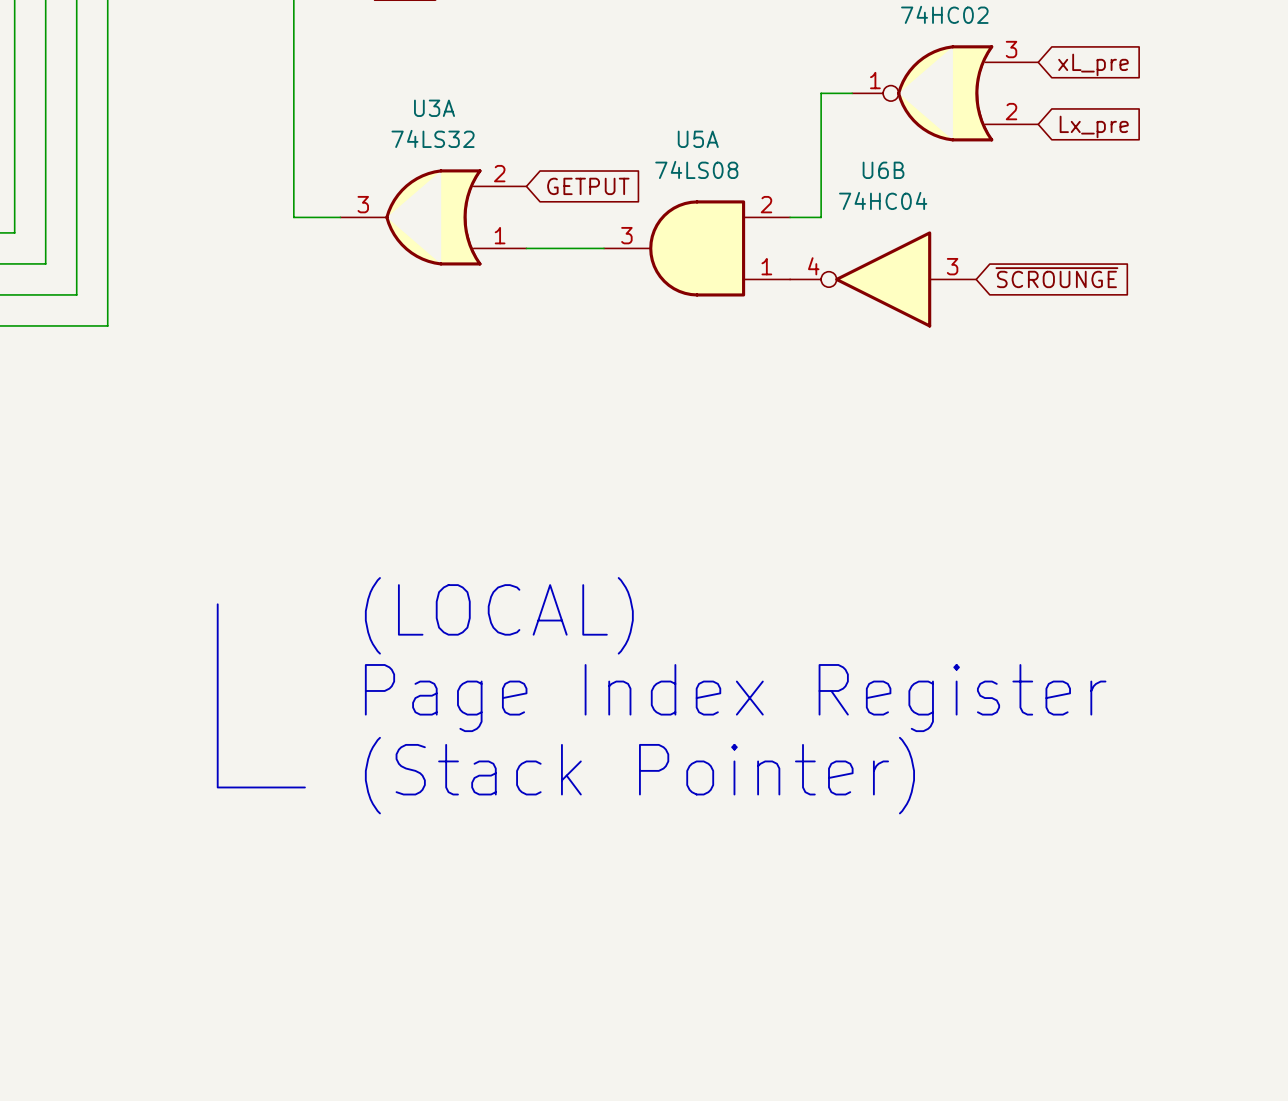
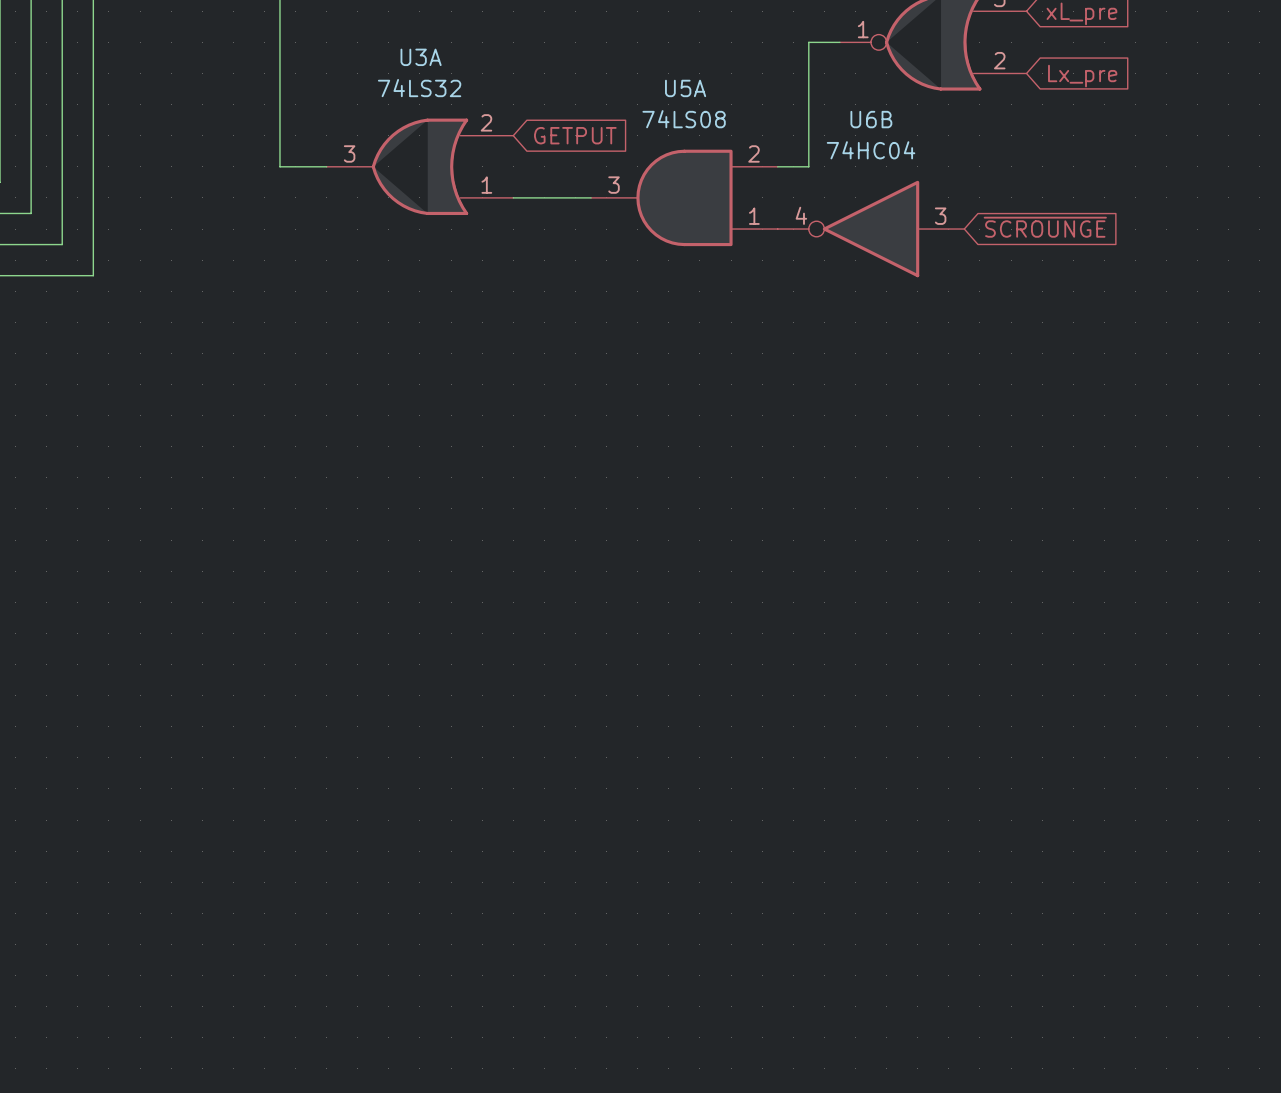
text: (LOCAL) (499, 615) -> none
text: L (261, 695) -> none
text: Page Index Register (735, 698) -> none
text: (Stack Pointer) (639, 775) -> none

